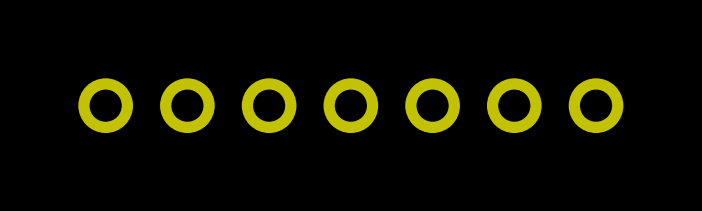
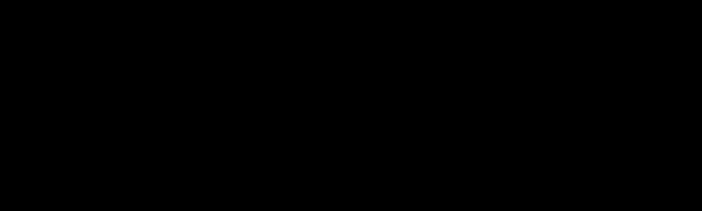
part: (350, 105) -> none

